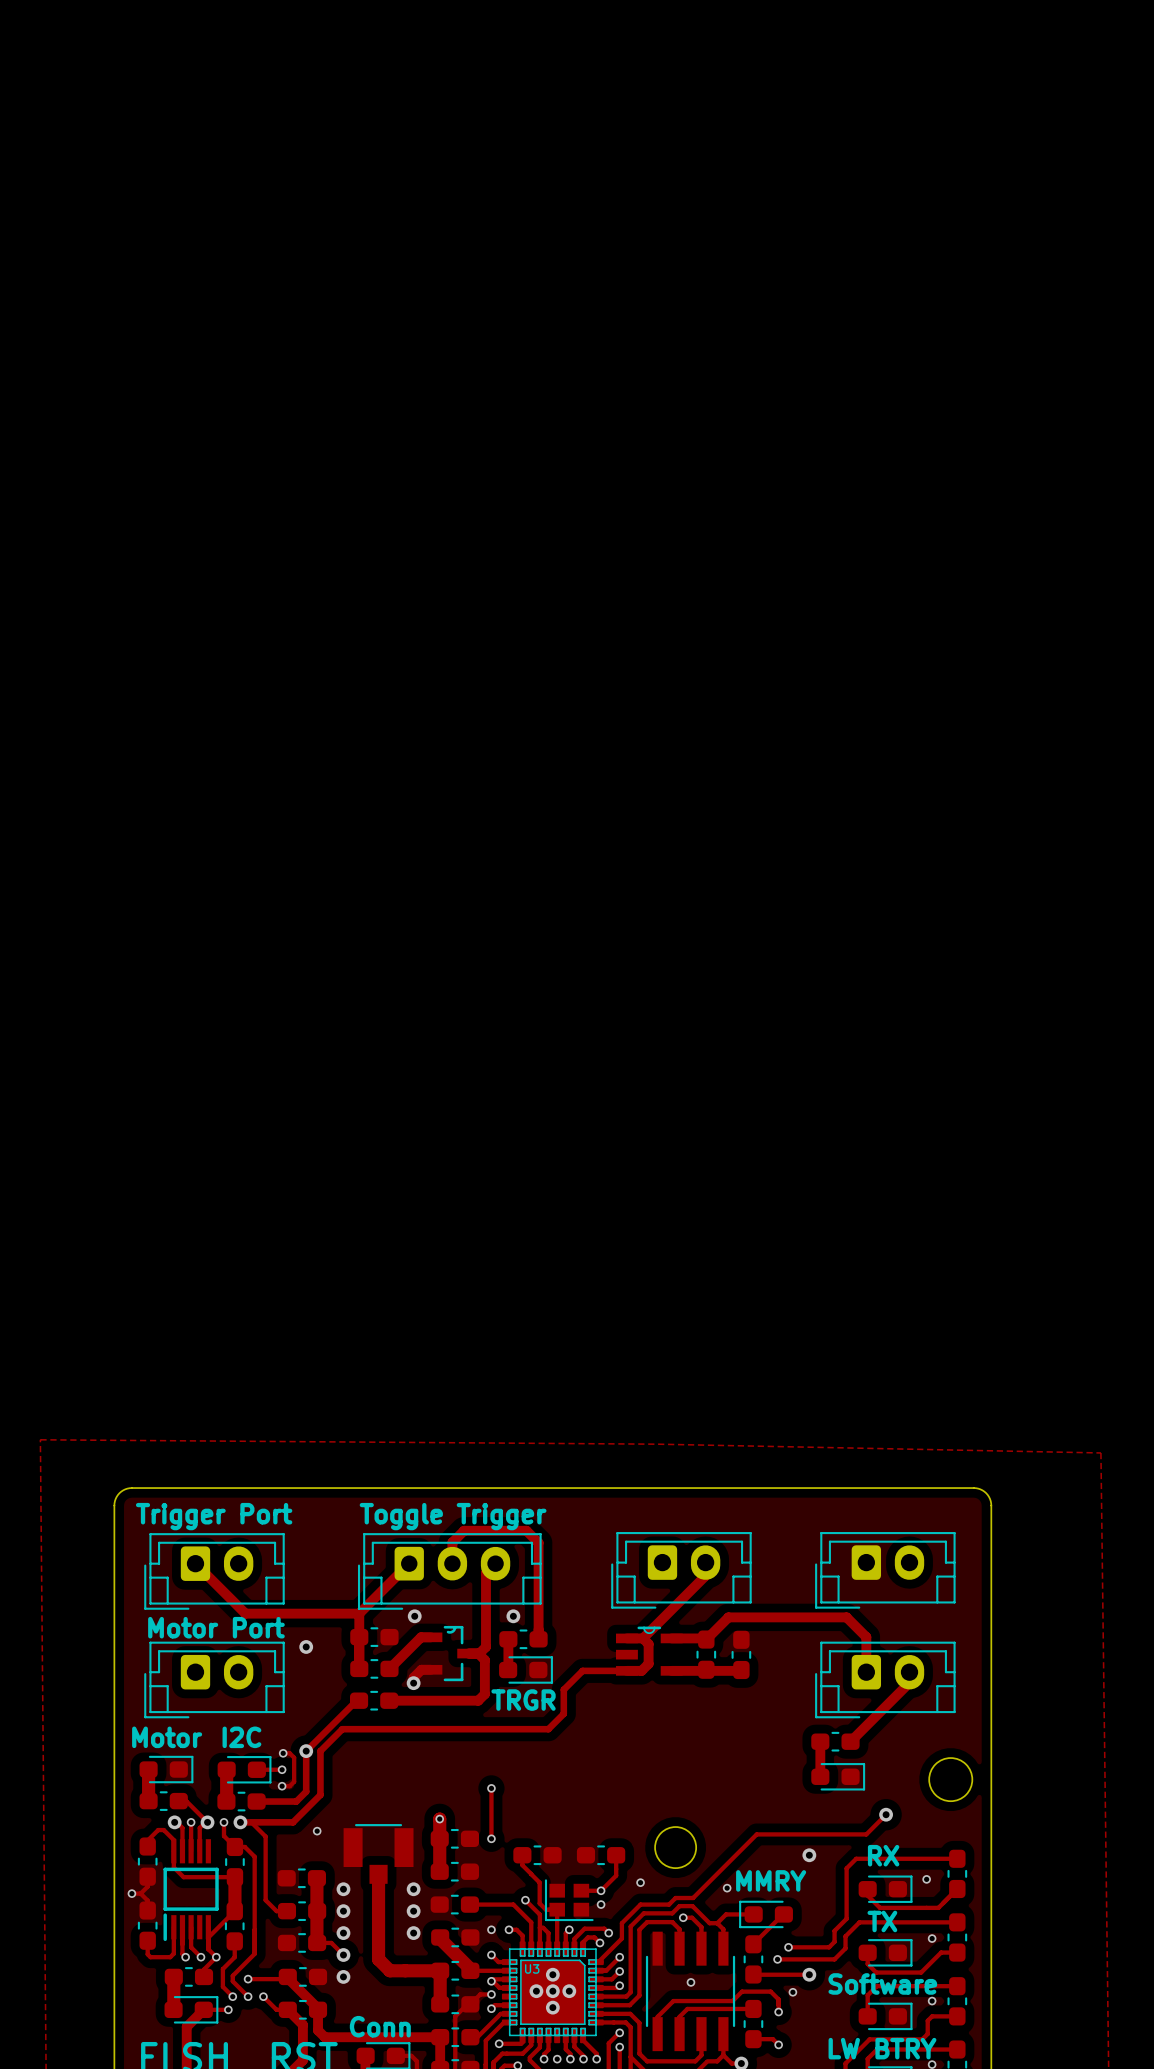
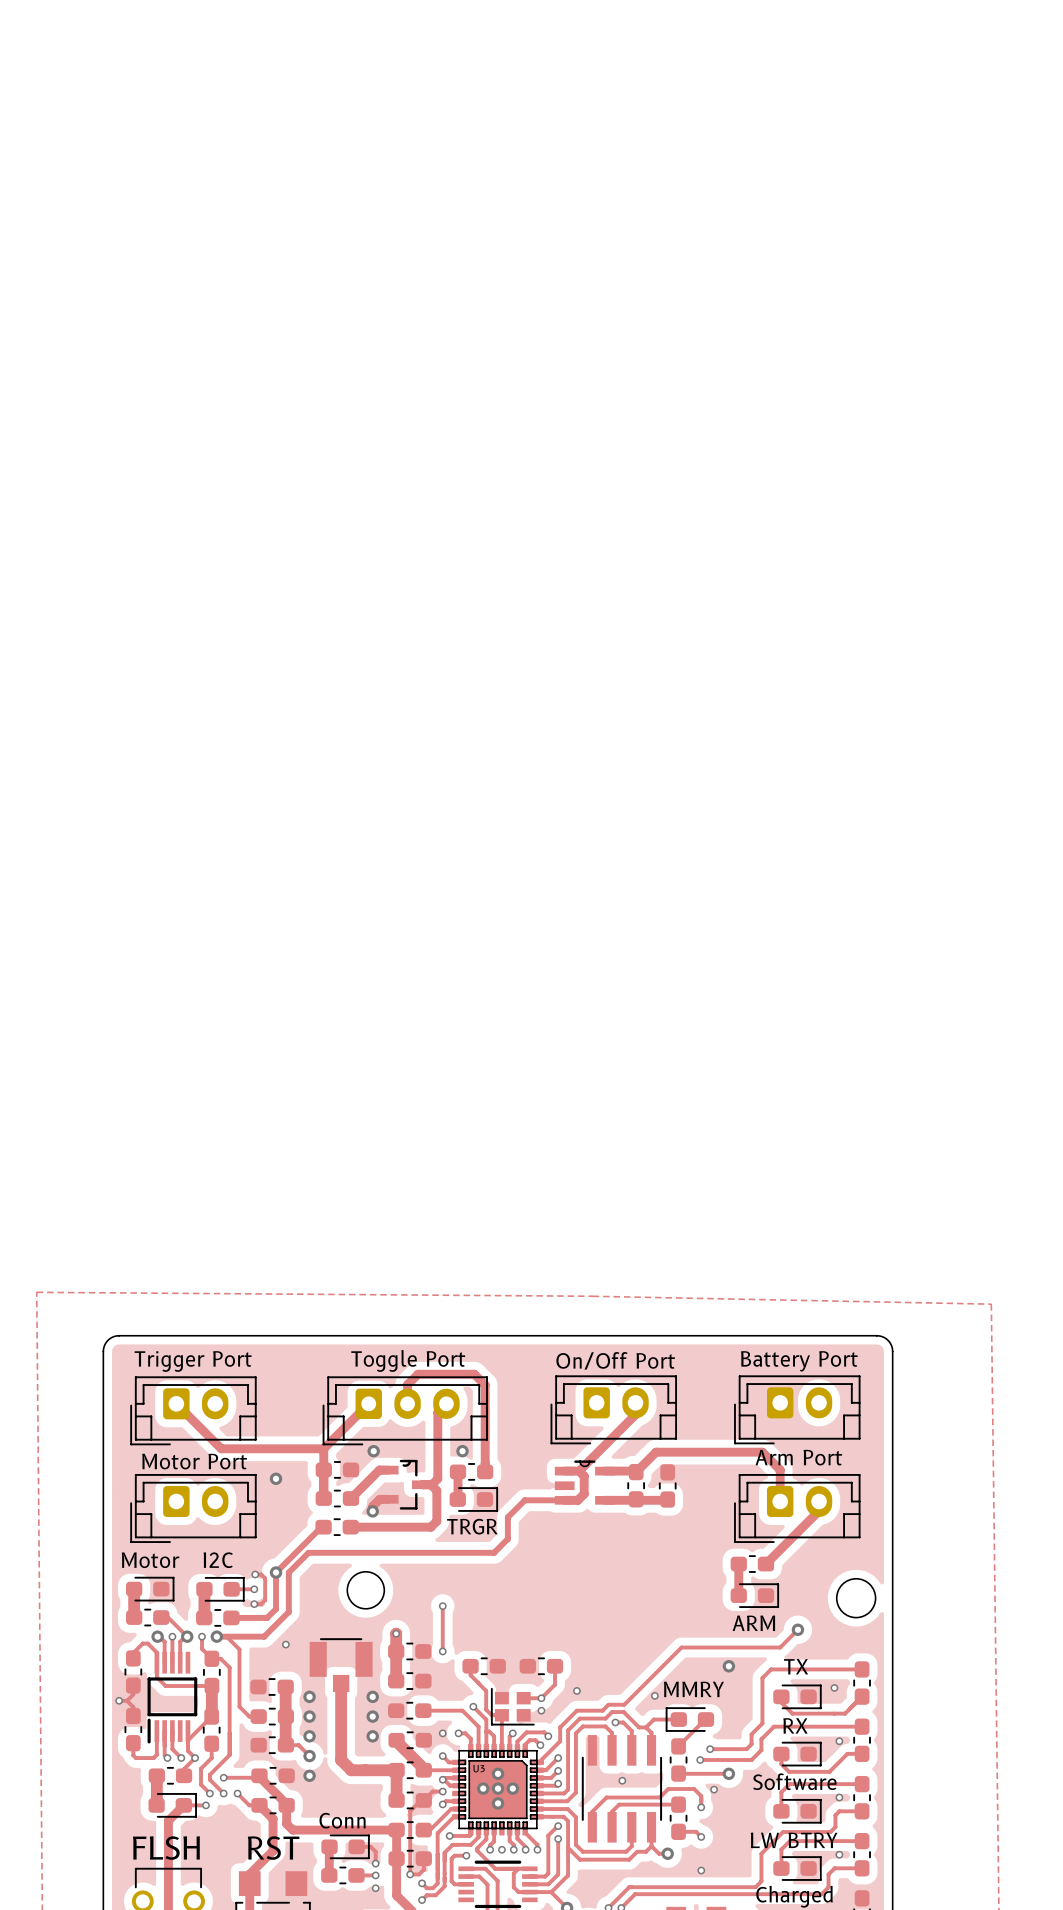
text: Toggle Trigger (453, 1516) -> Toggle Port (408, 1360)
text: none -> Battery Port (799, 1361)
text: none -> On/Off Port (615, 1360)
text: none -> Arm Port (798, 1457)
text: none -> ARM (753, 1623)
round board edge position: (675, 1847) -> (365, 1590)
text: RX (883, 1855) -> TX (796, 1666)
text: TX (882, 1921) -> RX (795, 1725)

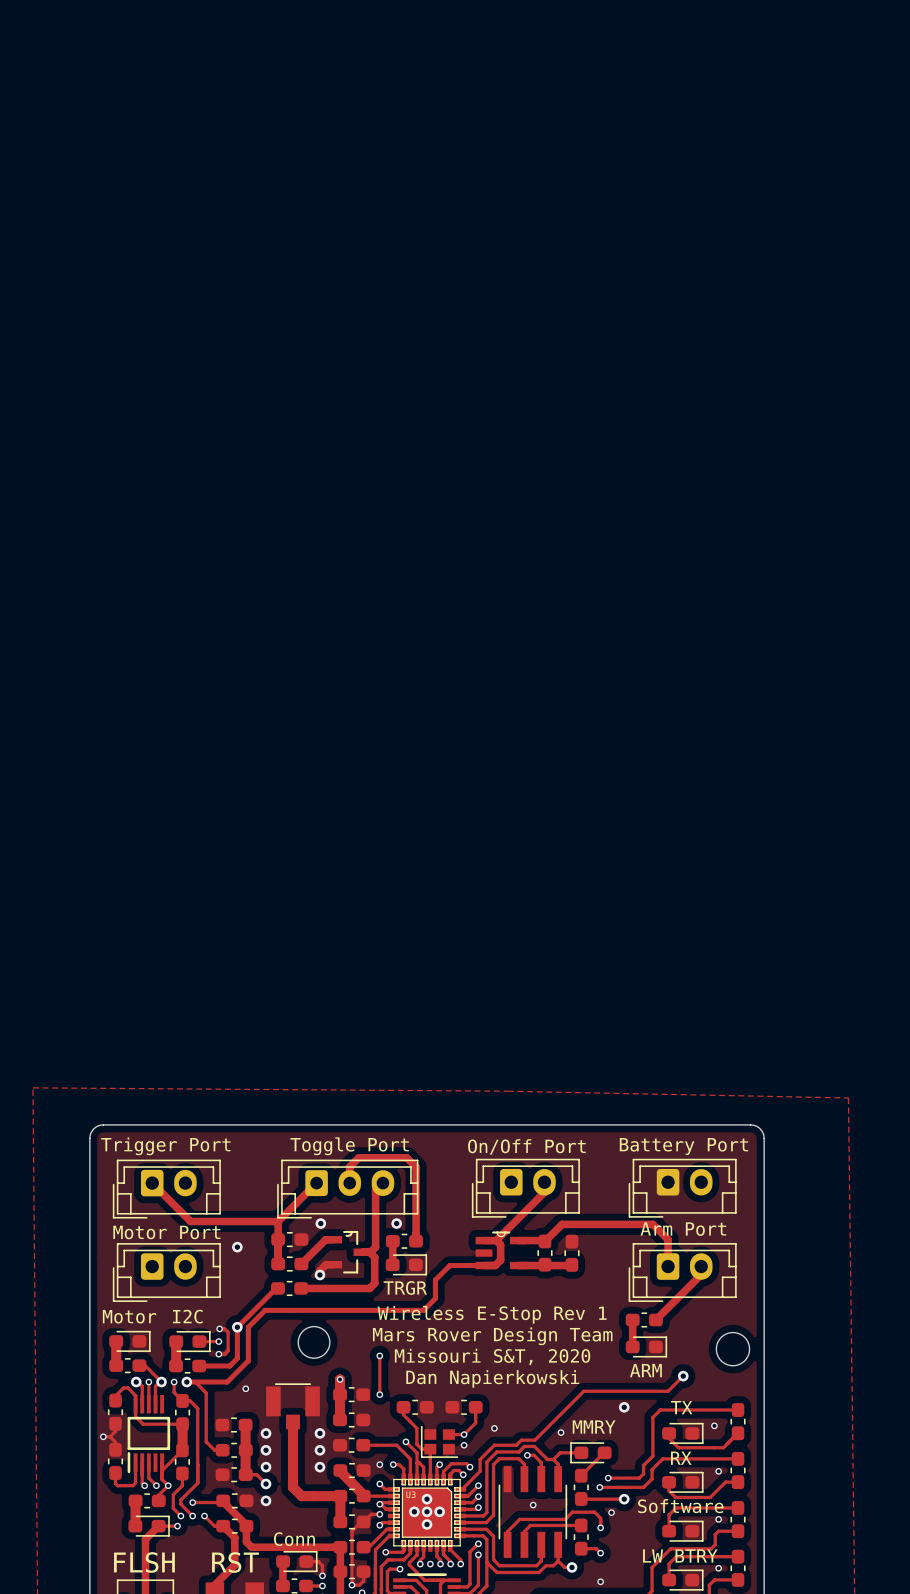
text: none -> Wireless E-Stop Rev 1 (492, 1314)
text: none -> Mars Rover Design Team (492, 1336)
text: none -> Missouri S&T, 2020 (492, 1356)
text: none -> Dan Napierkowski (492, 1378)

